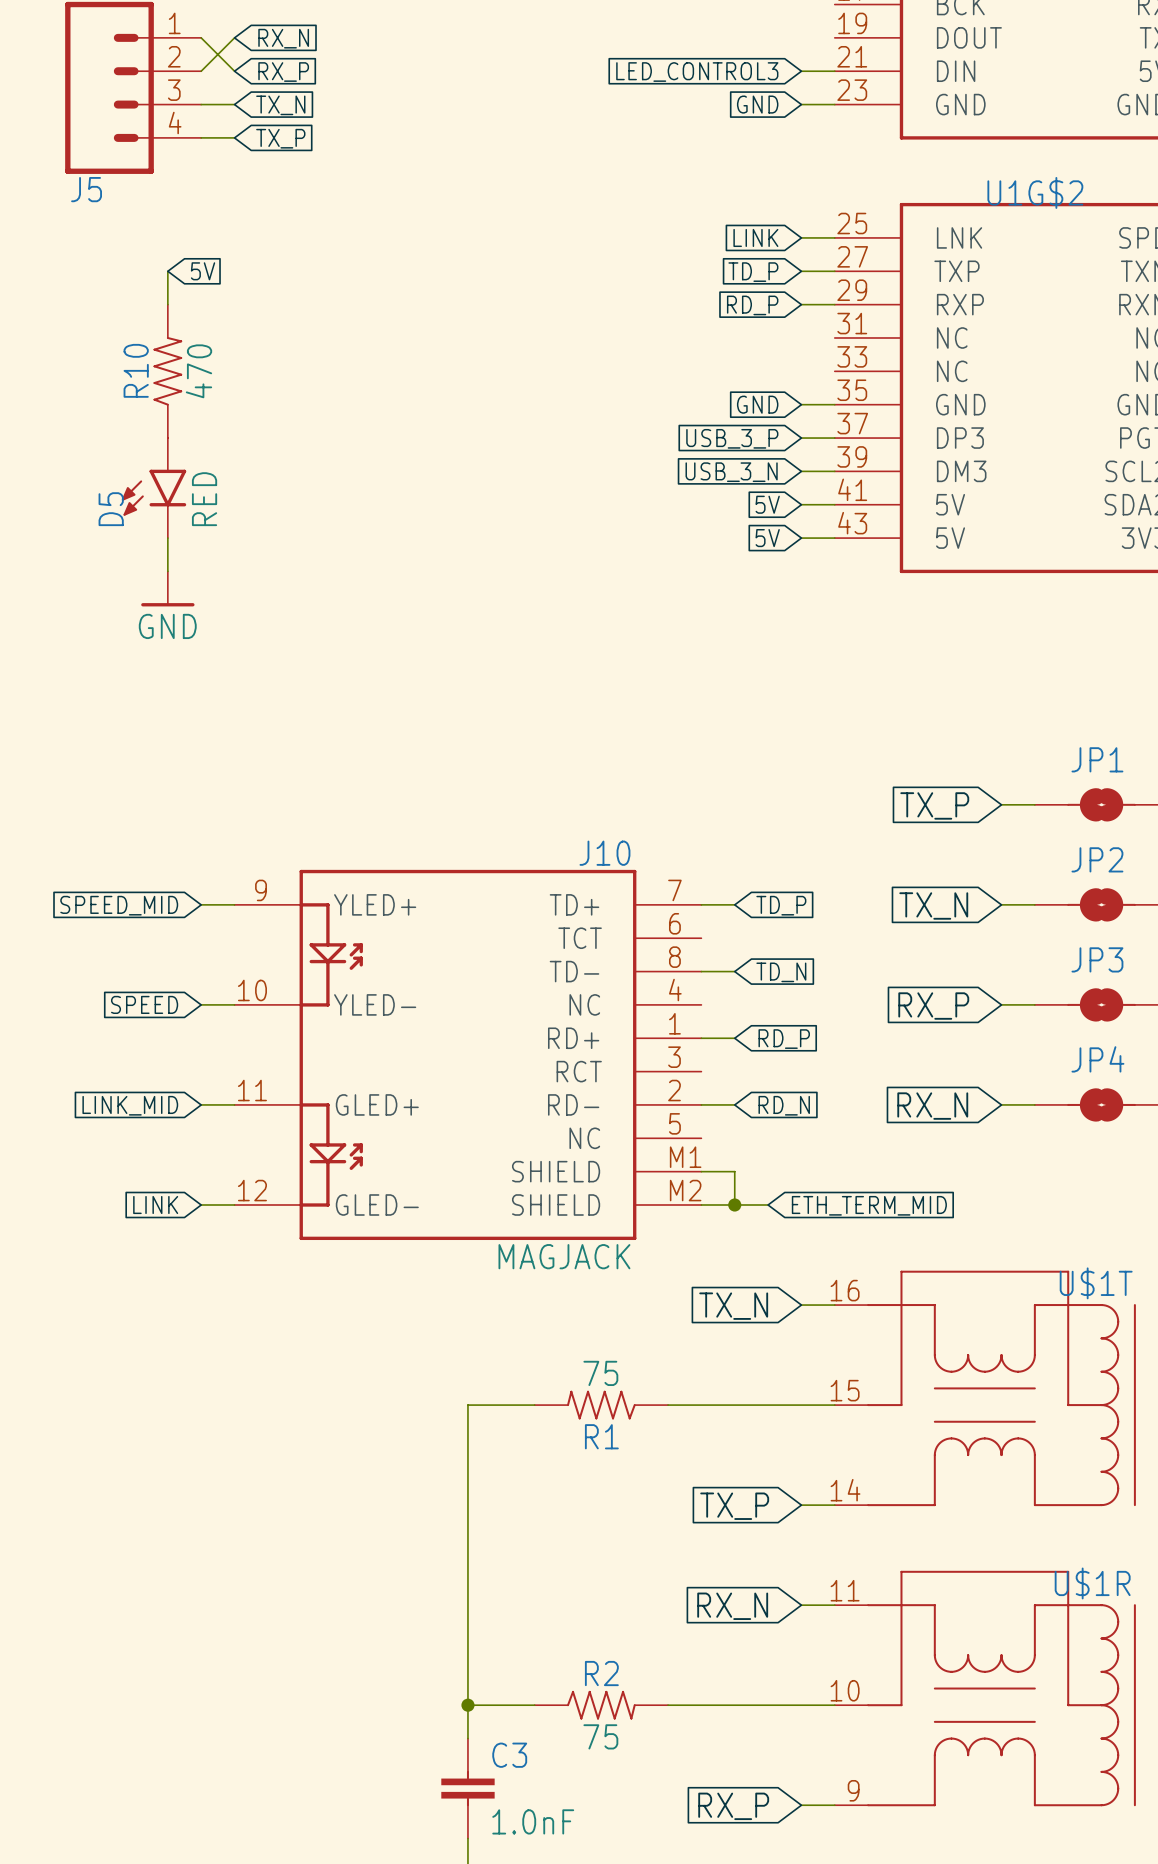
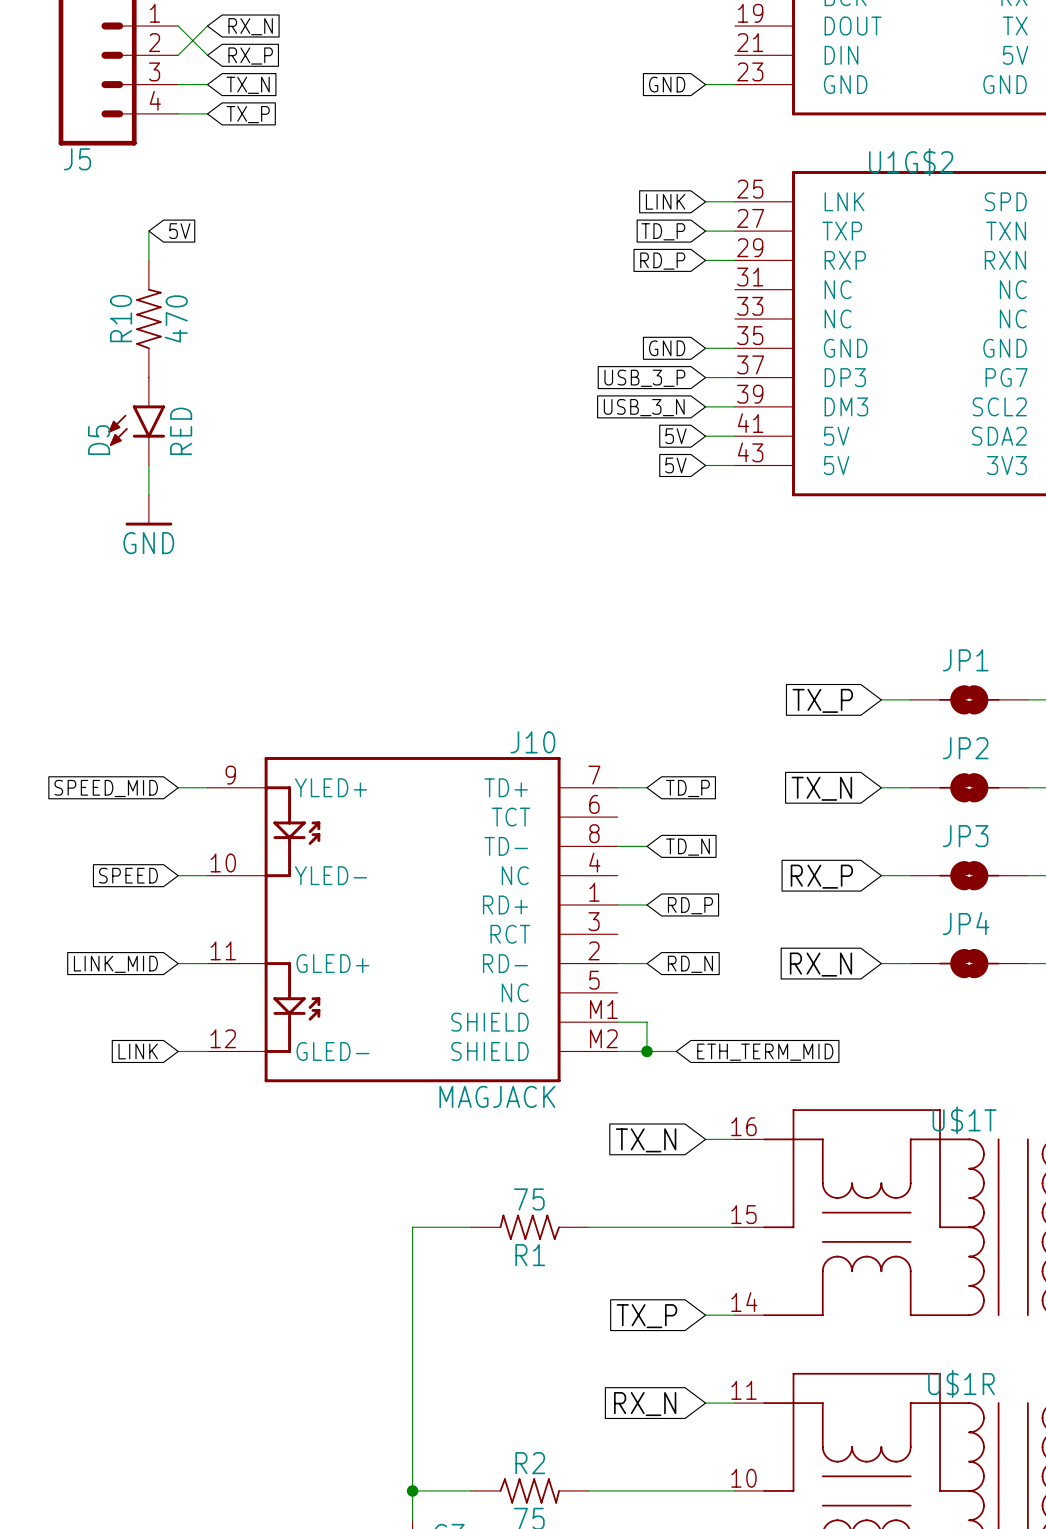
wire: (801, 71) (834, 71) -> none
global label: LED_CONTROL3 (697, 72) -> none

